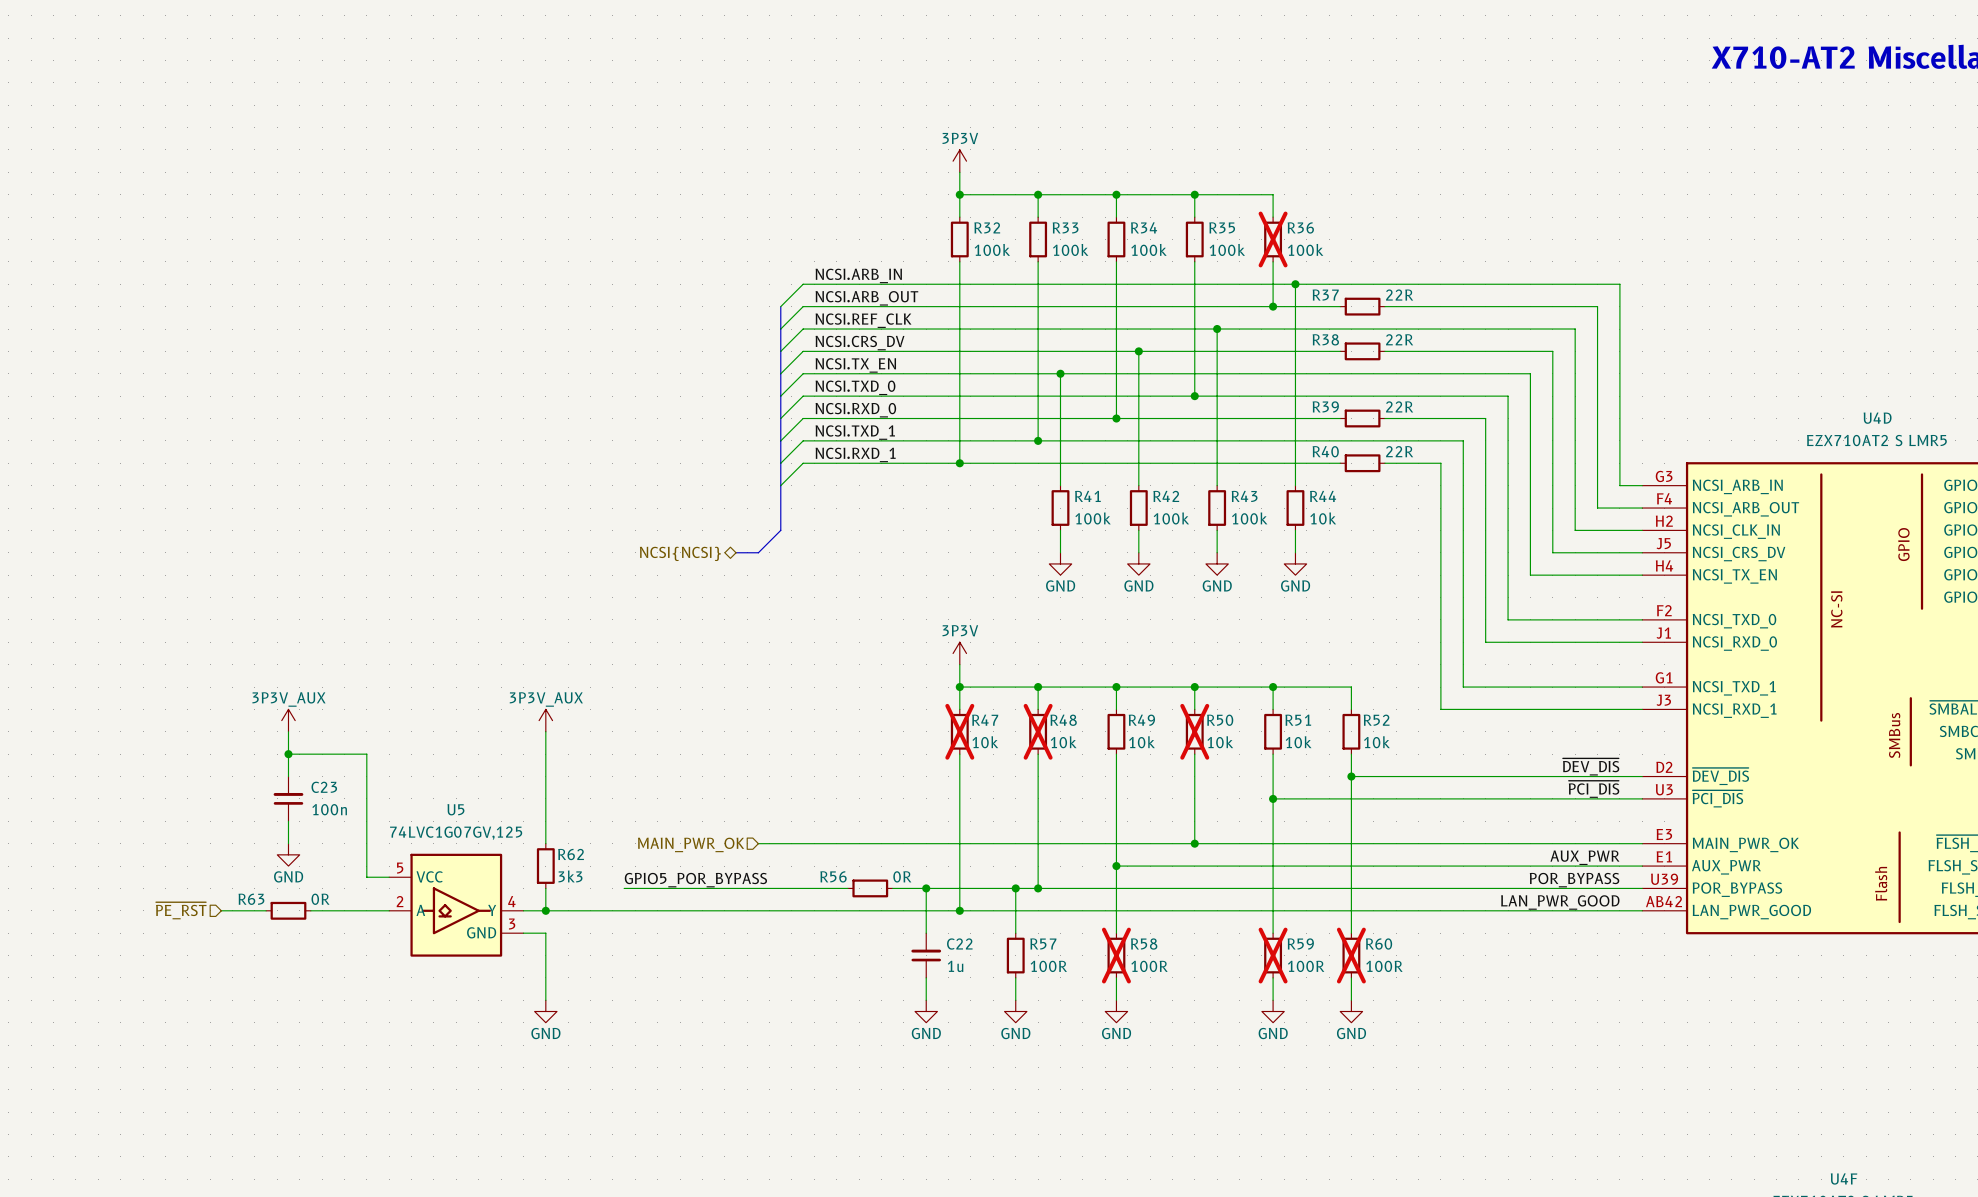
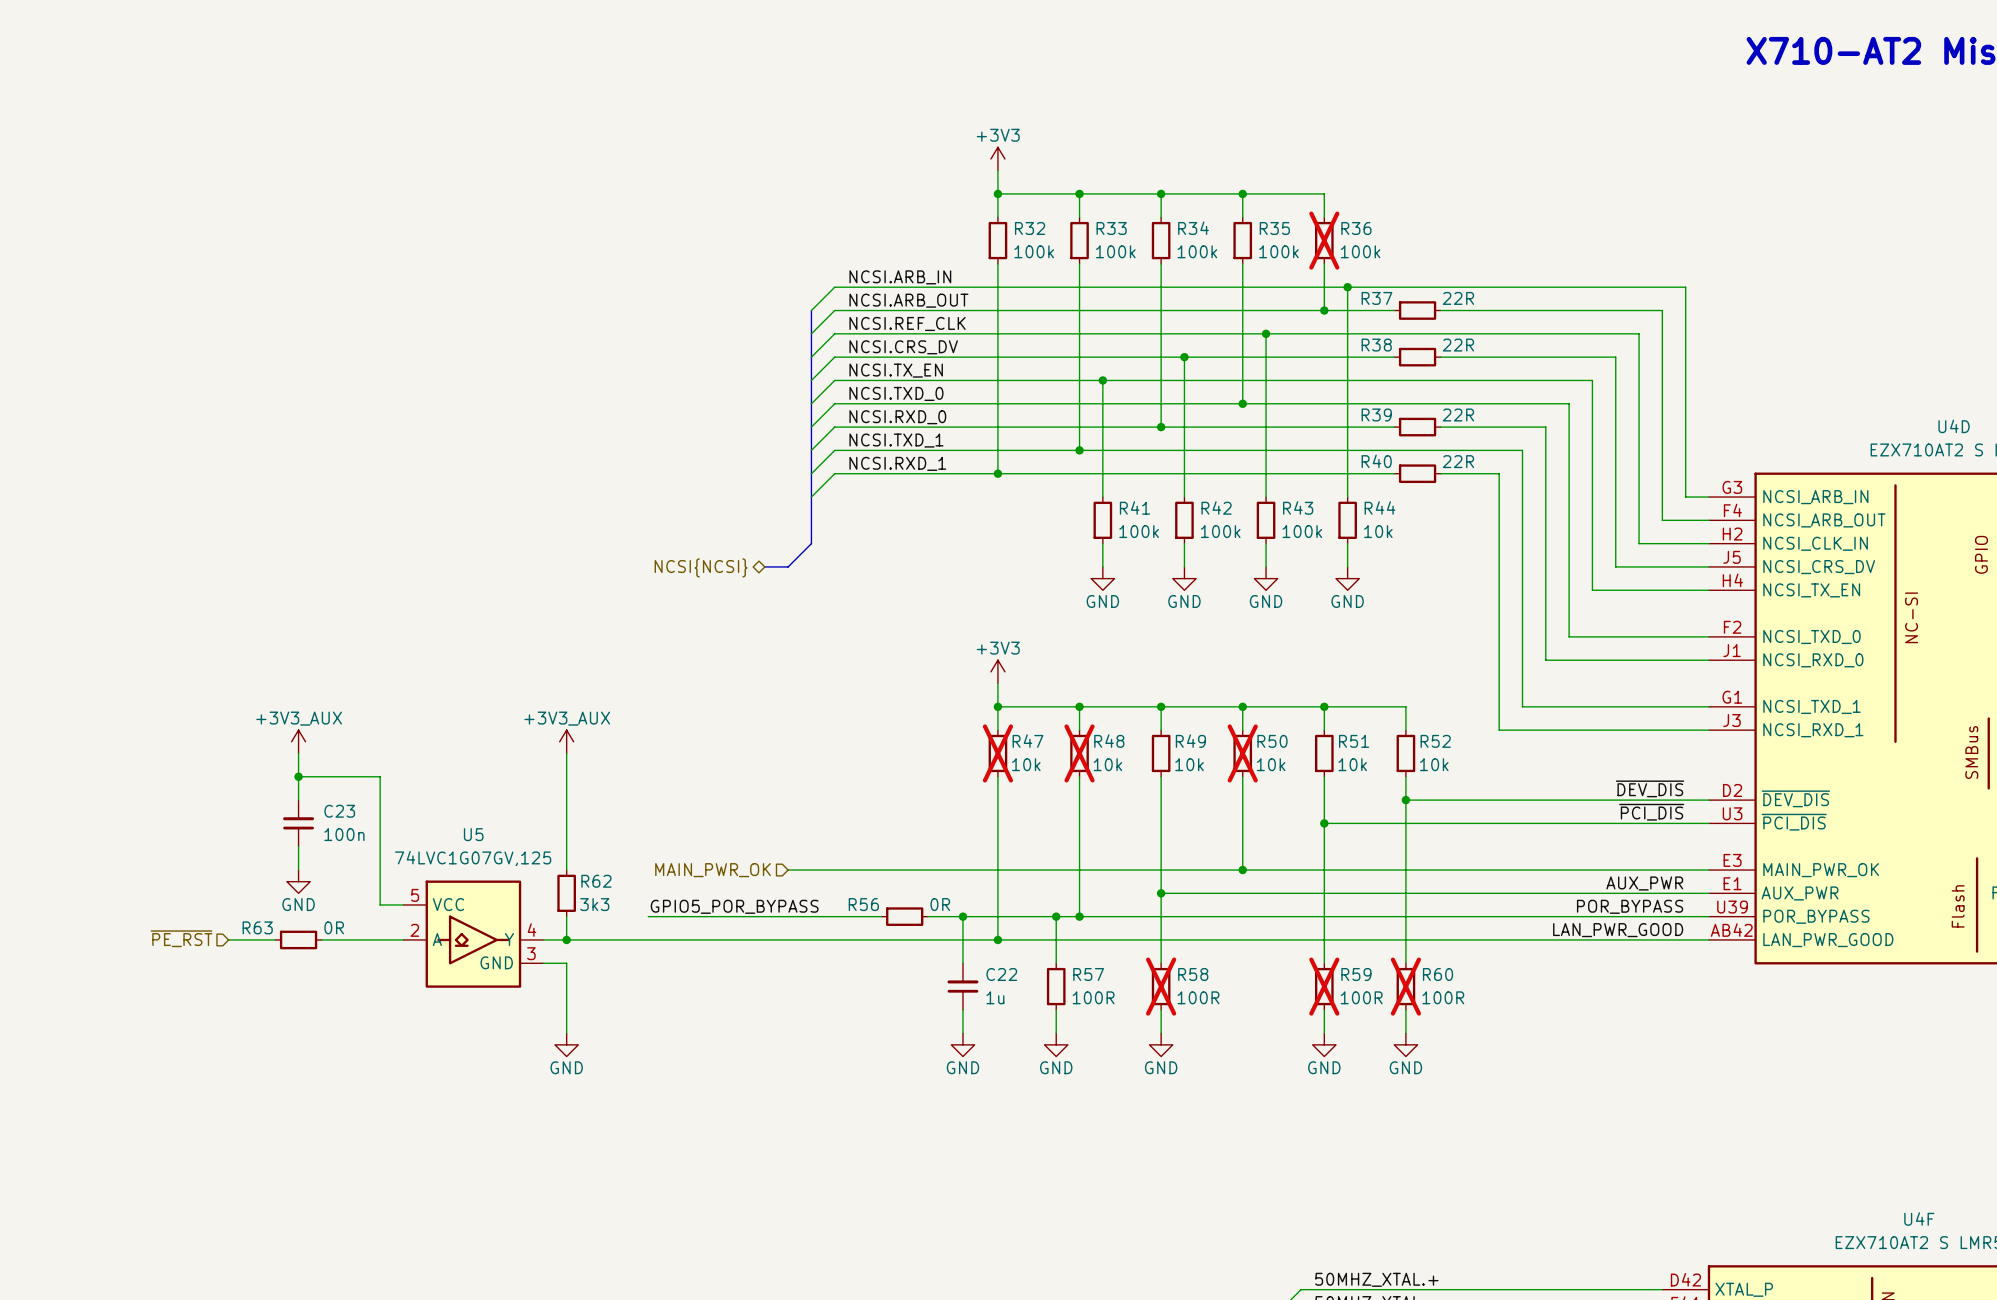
power symbol: 3P3V (959, 161) -> +3V3 (997, 158)
power symbol: 3P3V (959, 653) -> +3V3 (997, 671)
power symbol: 3P3V_AUX (288, 720) -> +3V3_AUX (298, 741)
power symbol: 3P3V_AUX (545, 720) -> +3V3_AUX (566, 741)

